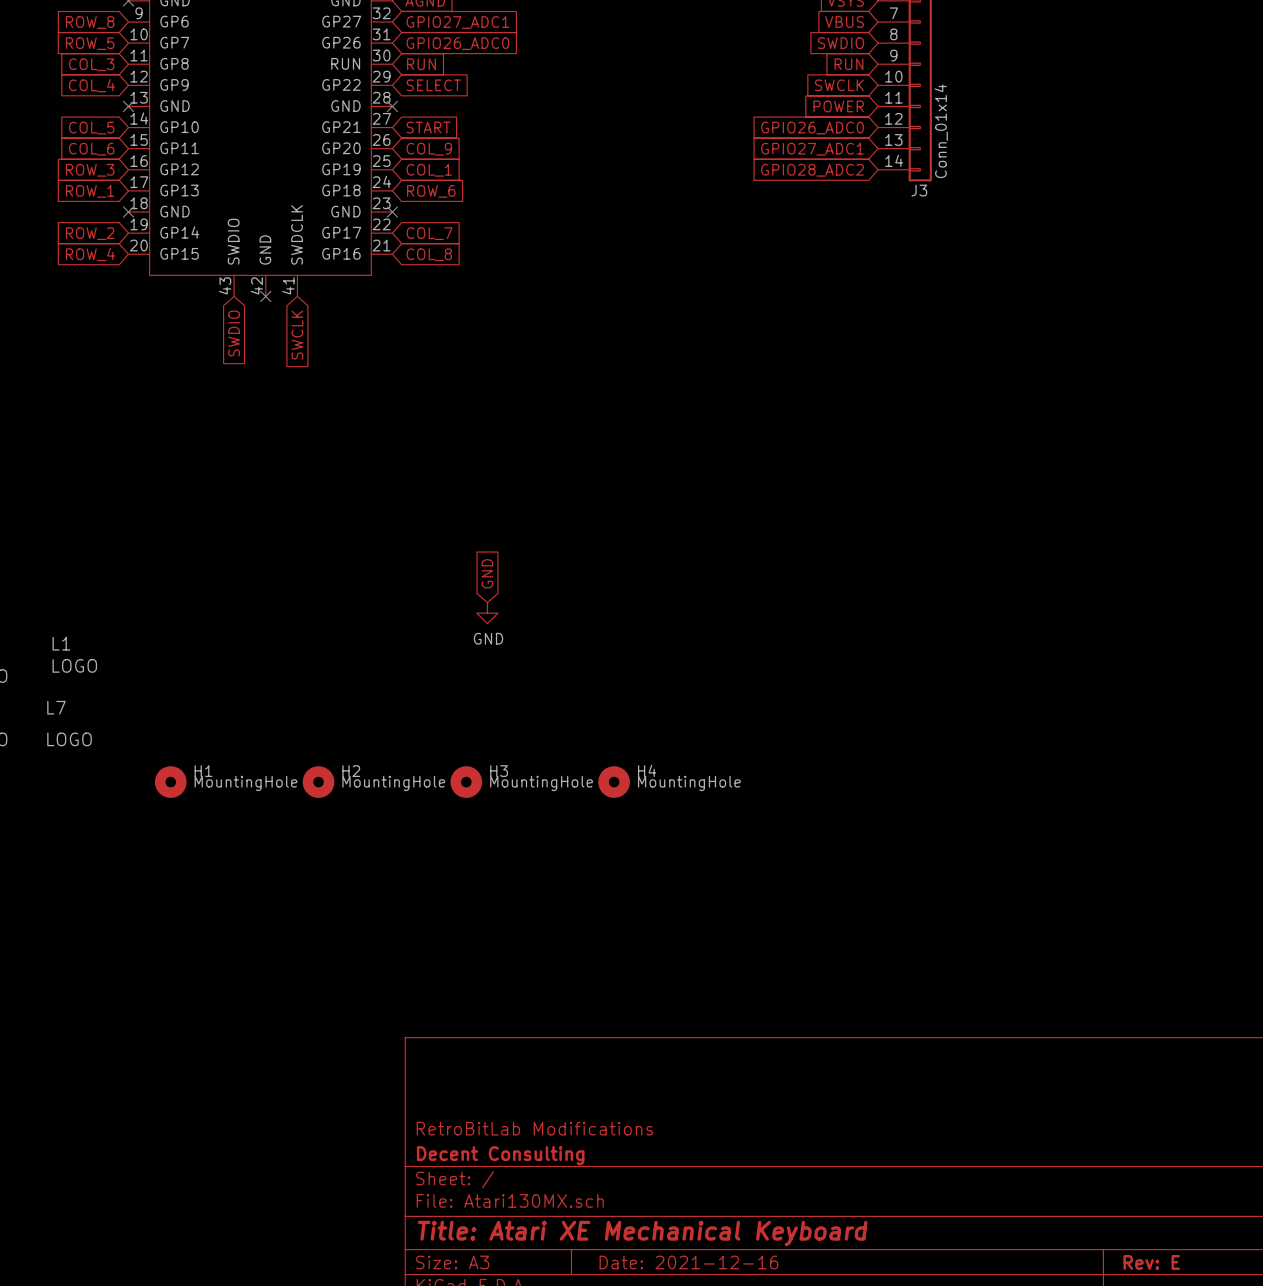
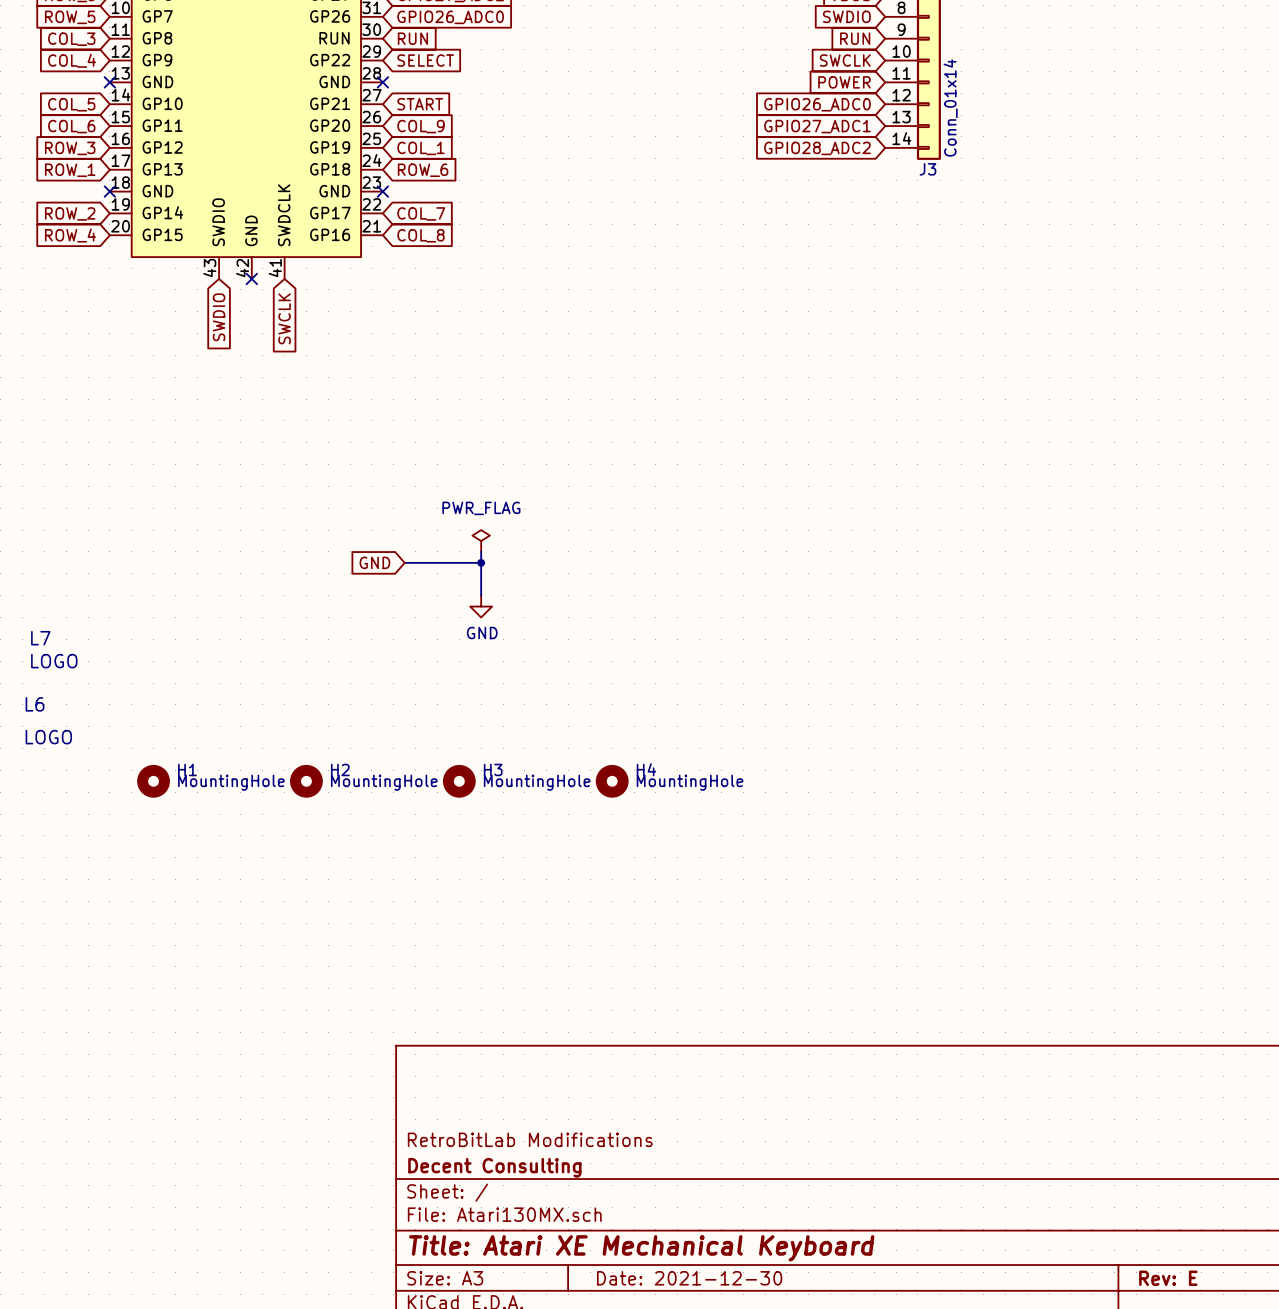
power symbol: none -> PWR_FLAG (481, 541)
wire: none -> (481, 551) (481, 595)
wire: none -> (404, 562) (481, 562)
junction: none -> (481, 562)
global label rotation: 0° (487, 573) -> 90° counterclockwise (374, 562)
global label position: GND (487, 573) -> GND (374, 562)
L1 name: L1 (61, 643) -> L7 (40, 638)
L7 name: L7 (56, 707) -> L6 (35, 704)
title block: Date: 2021-12-16 (688, 1262) -> Date: 2021-12-30 (689, 1278)

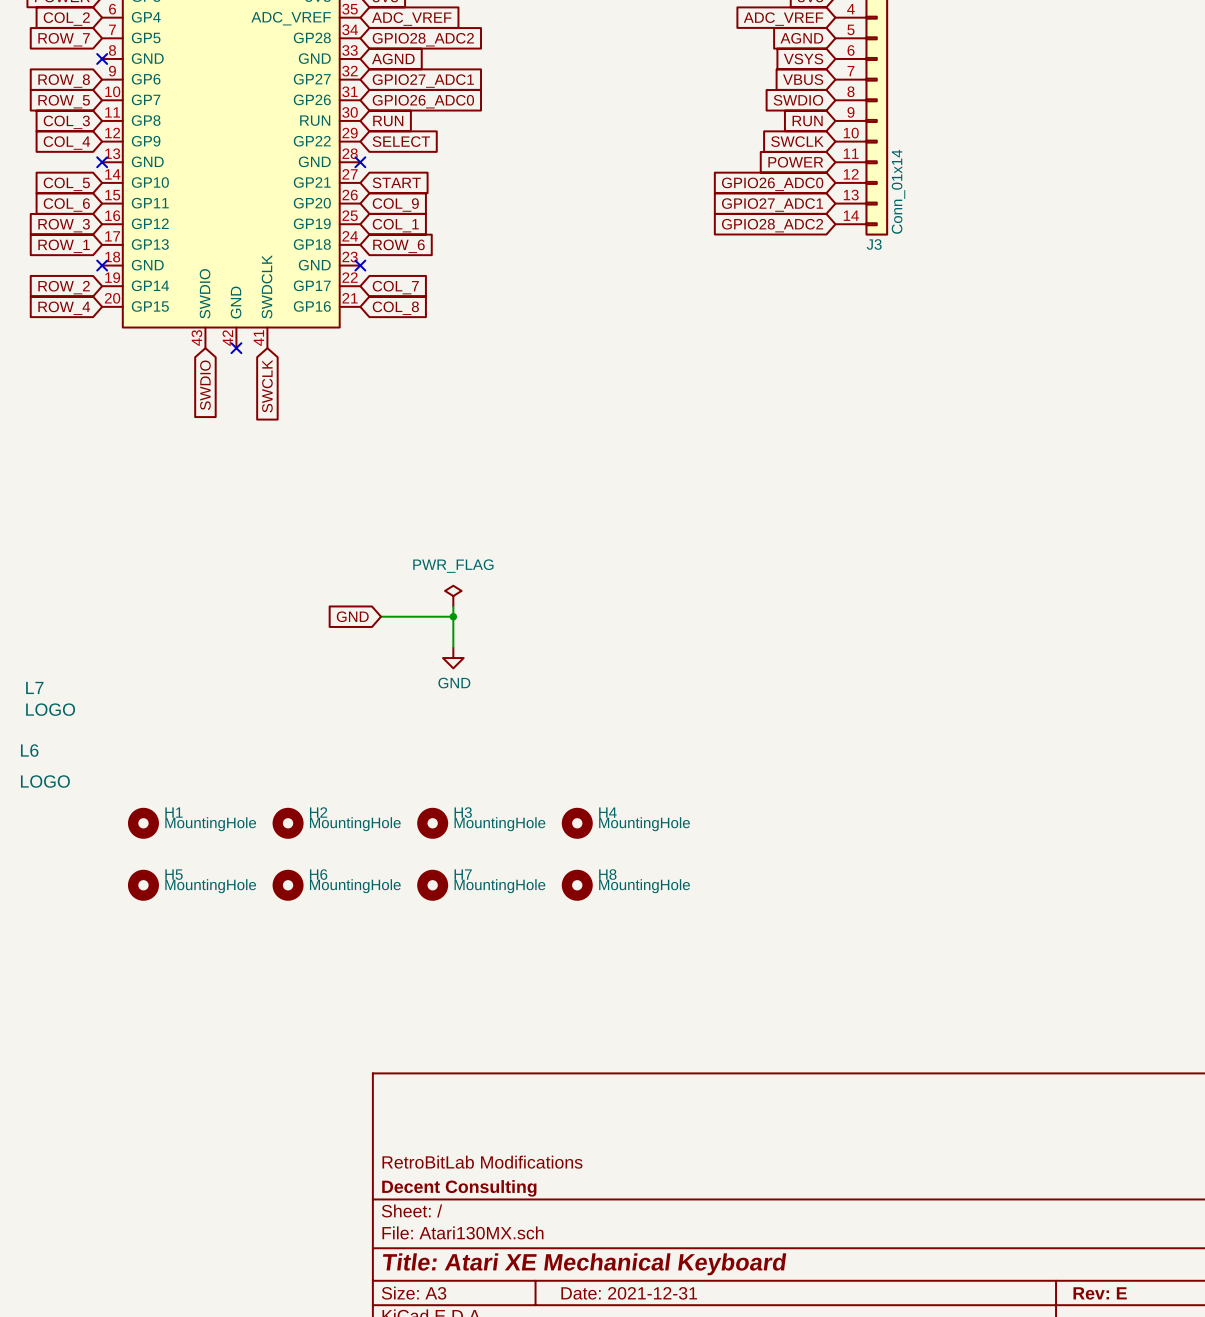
H5: none -> MountingHole (143, 885)
H6: none -> MountingHole (288, 885)
H7: none -> MountingHole (432, 885)
H8: none -> MountingHole (577, 885)
title block: Date: 2021-12-30 (689, 1278) -> Date: 2021-12-31 (629, 1293)

